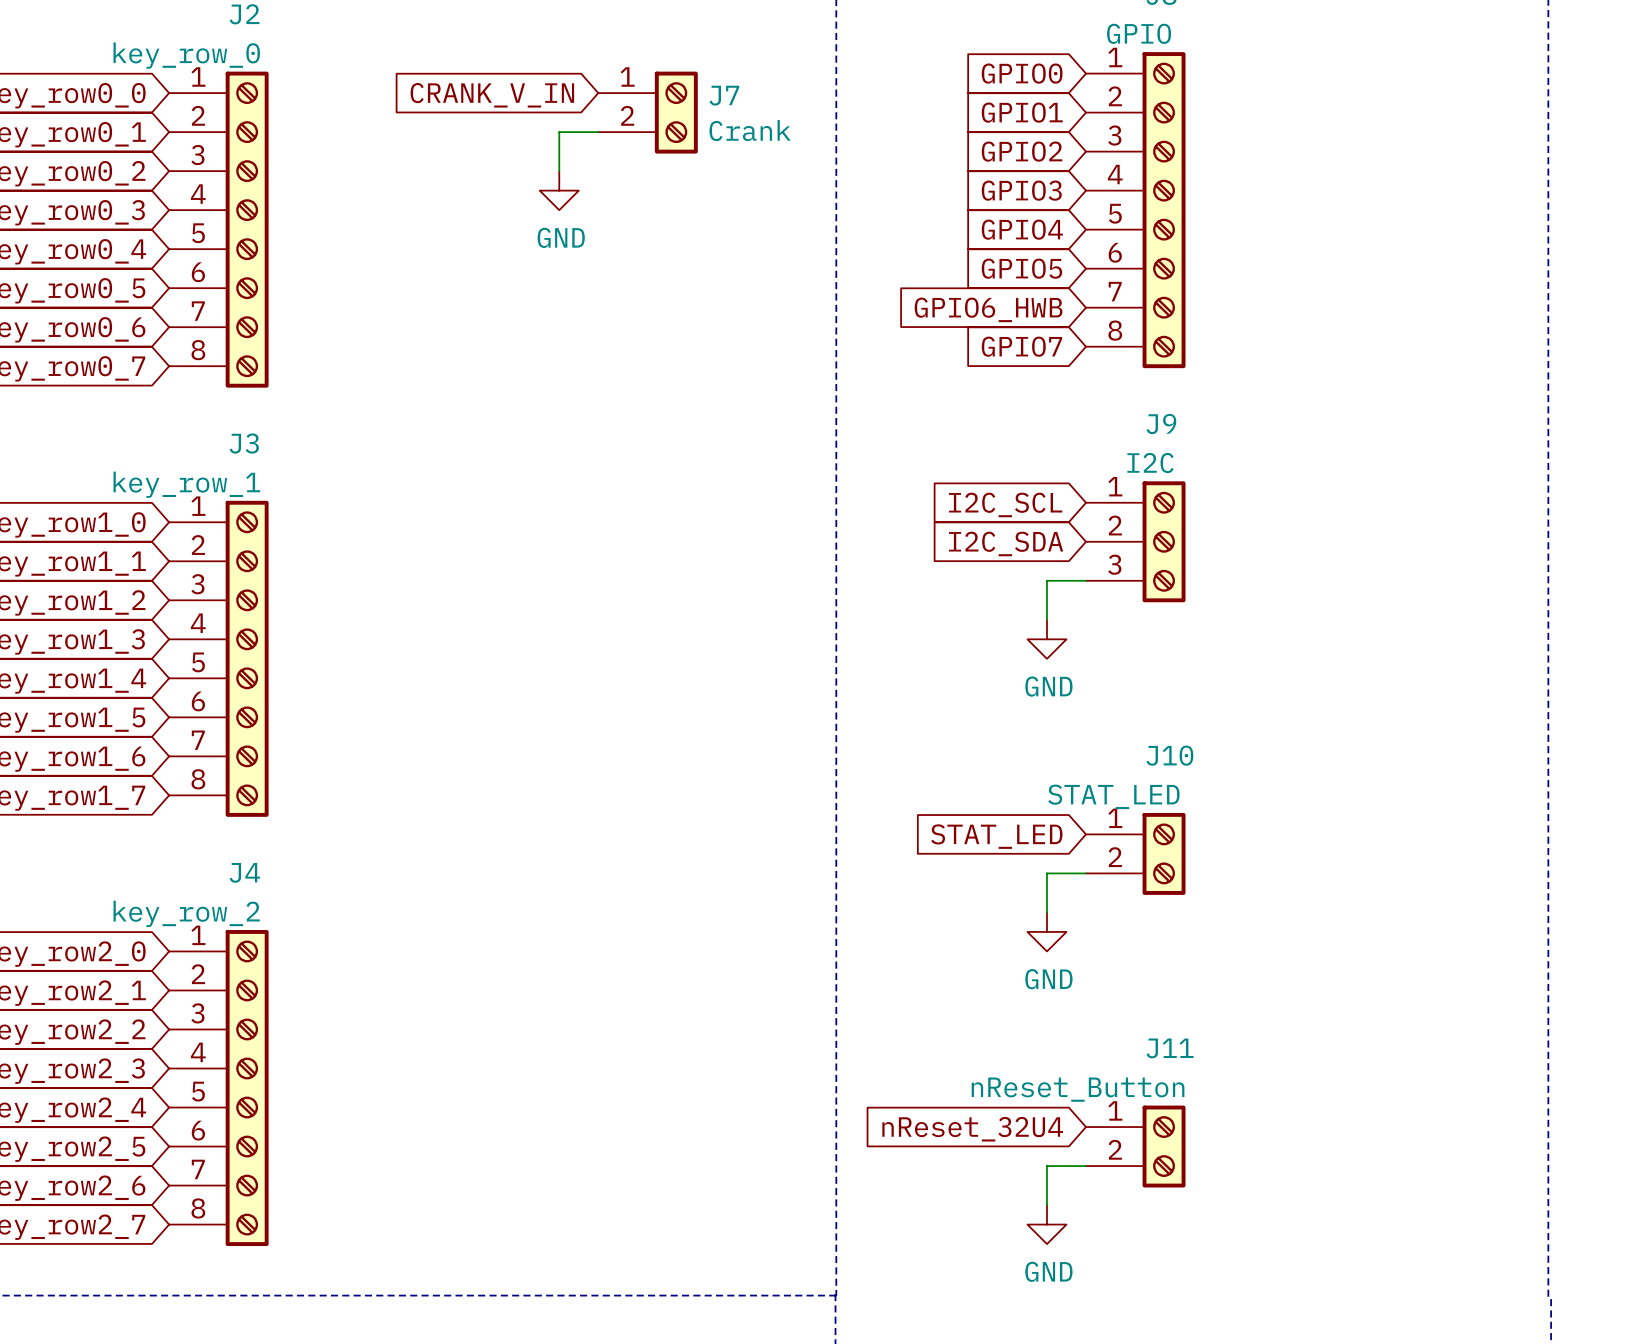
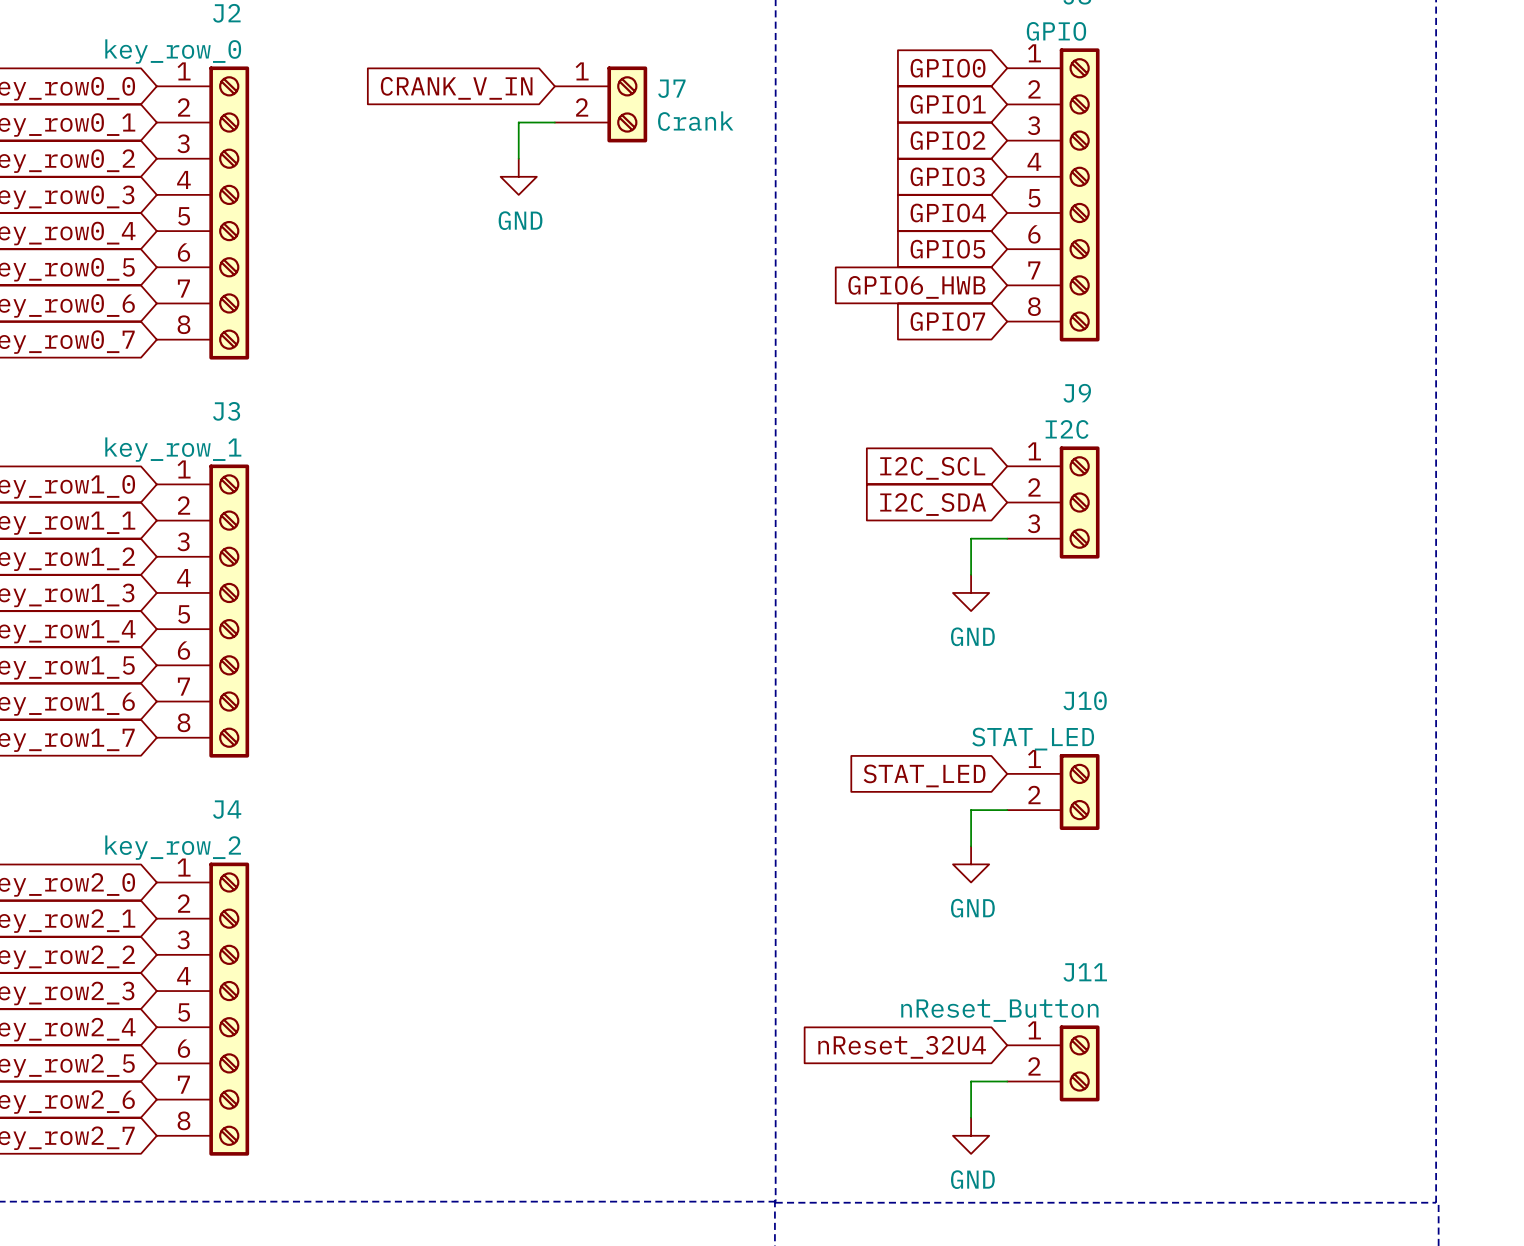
line: none -> (775, 1202) (1436, 1202)

